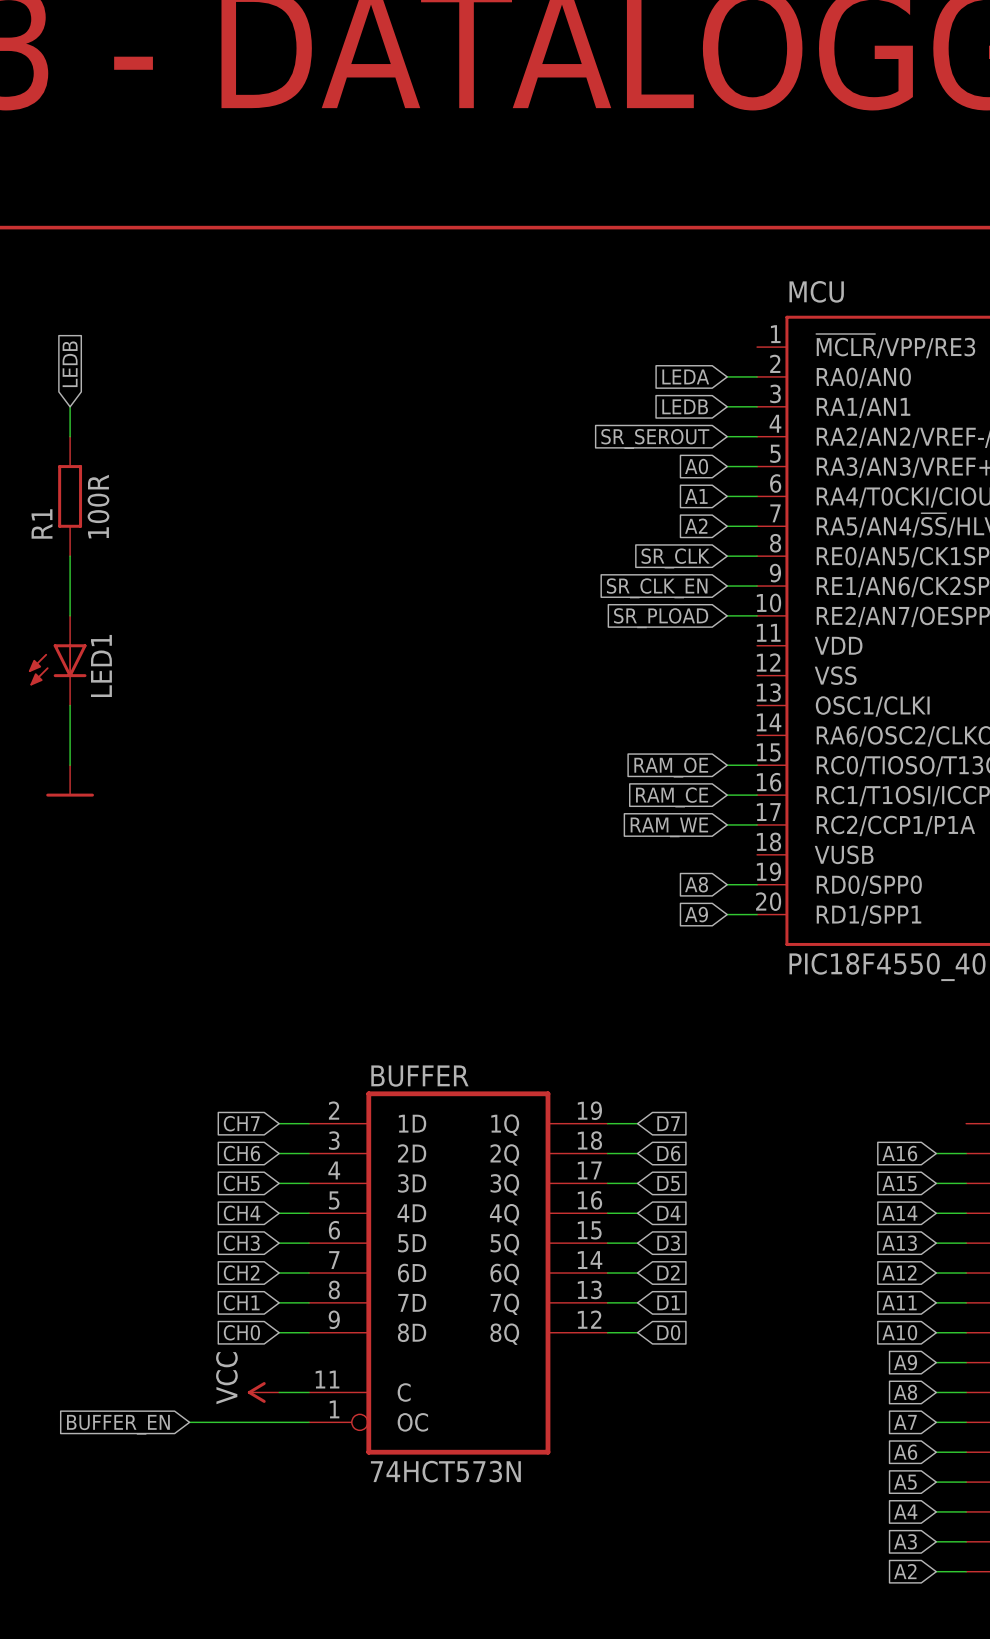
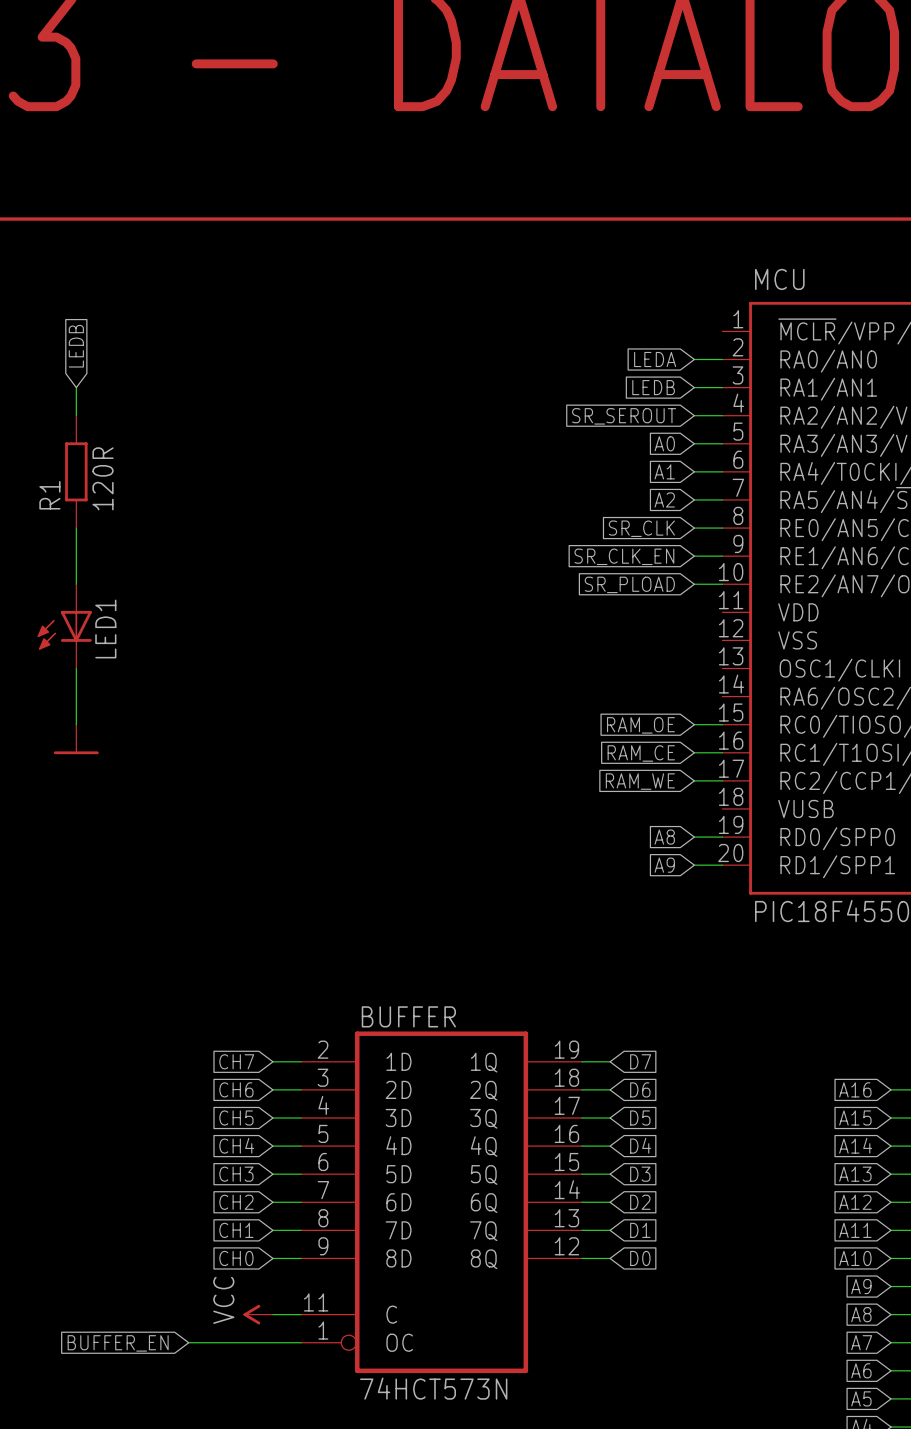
R1 value: 100R (98, 506) -> 120R (103, 478)

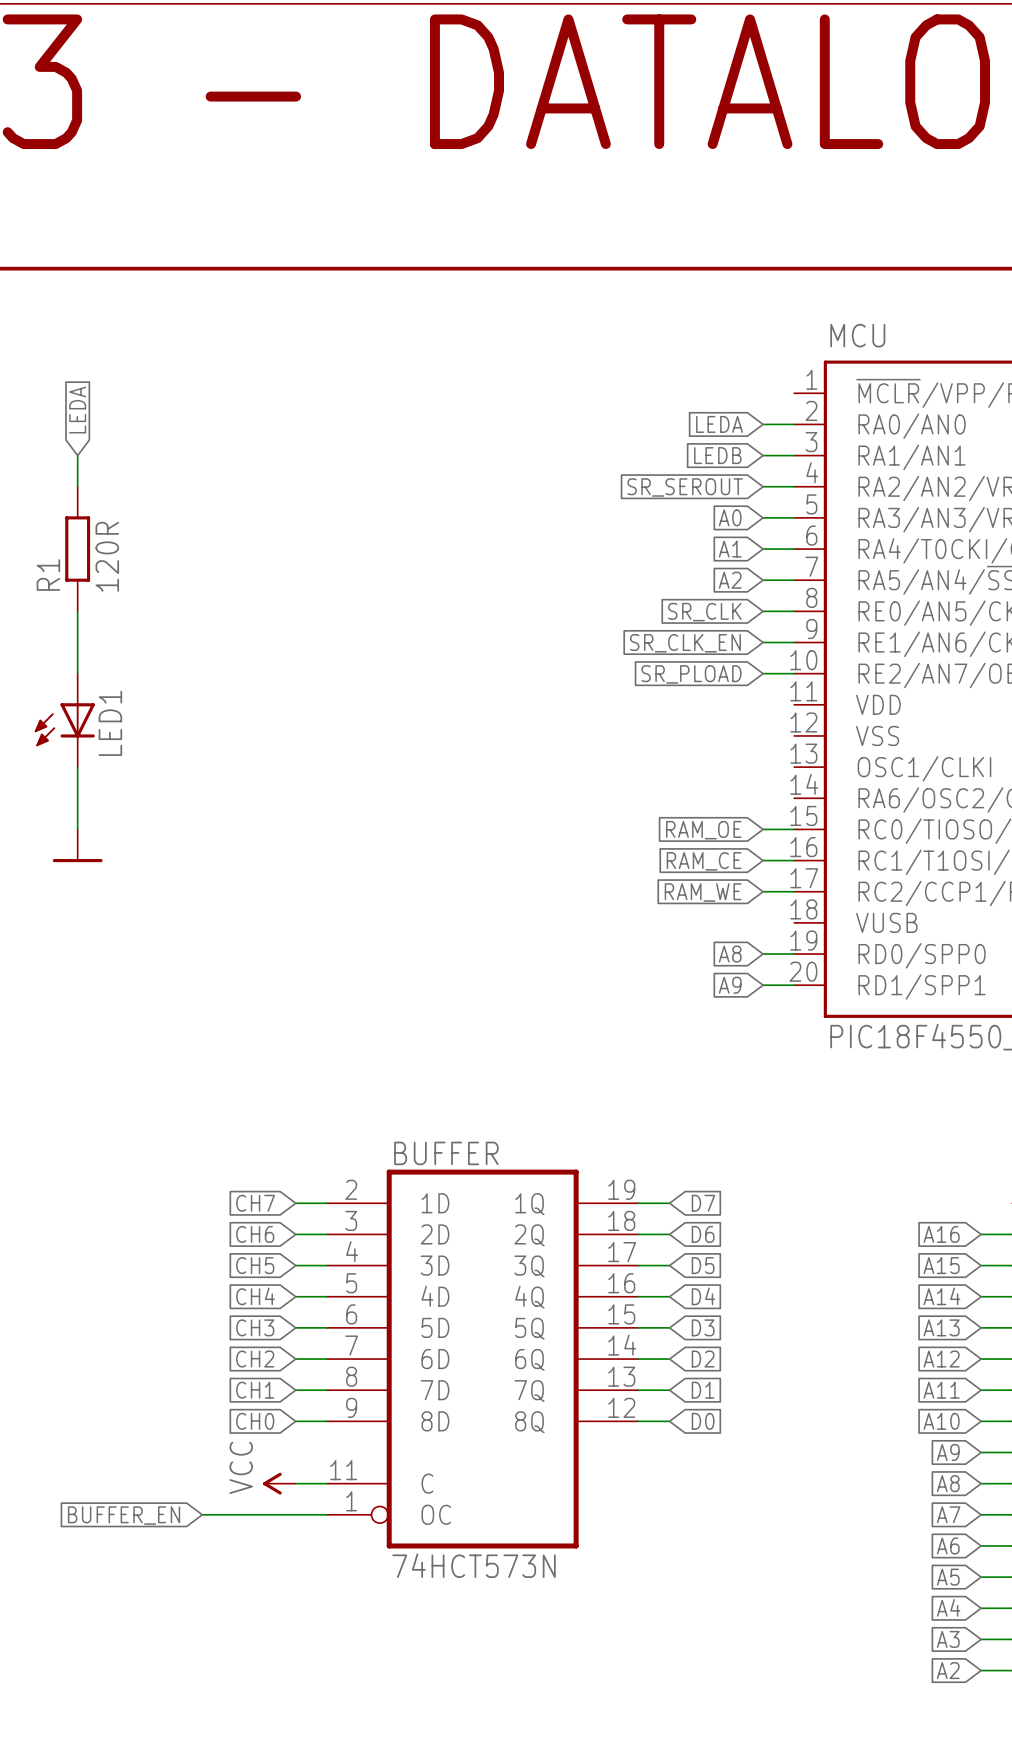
global label: LEDB (76, 346) -> LEDA (77, 410)

